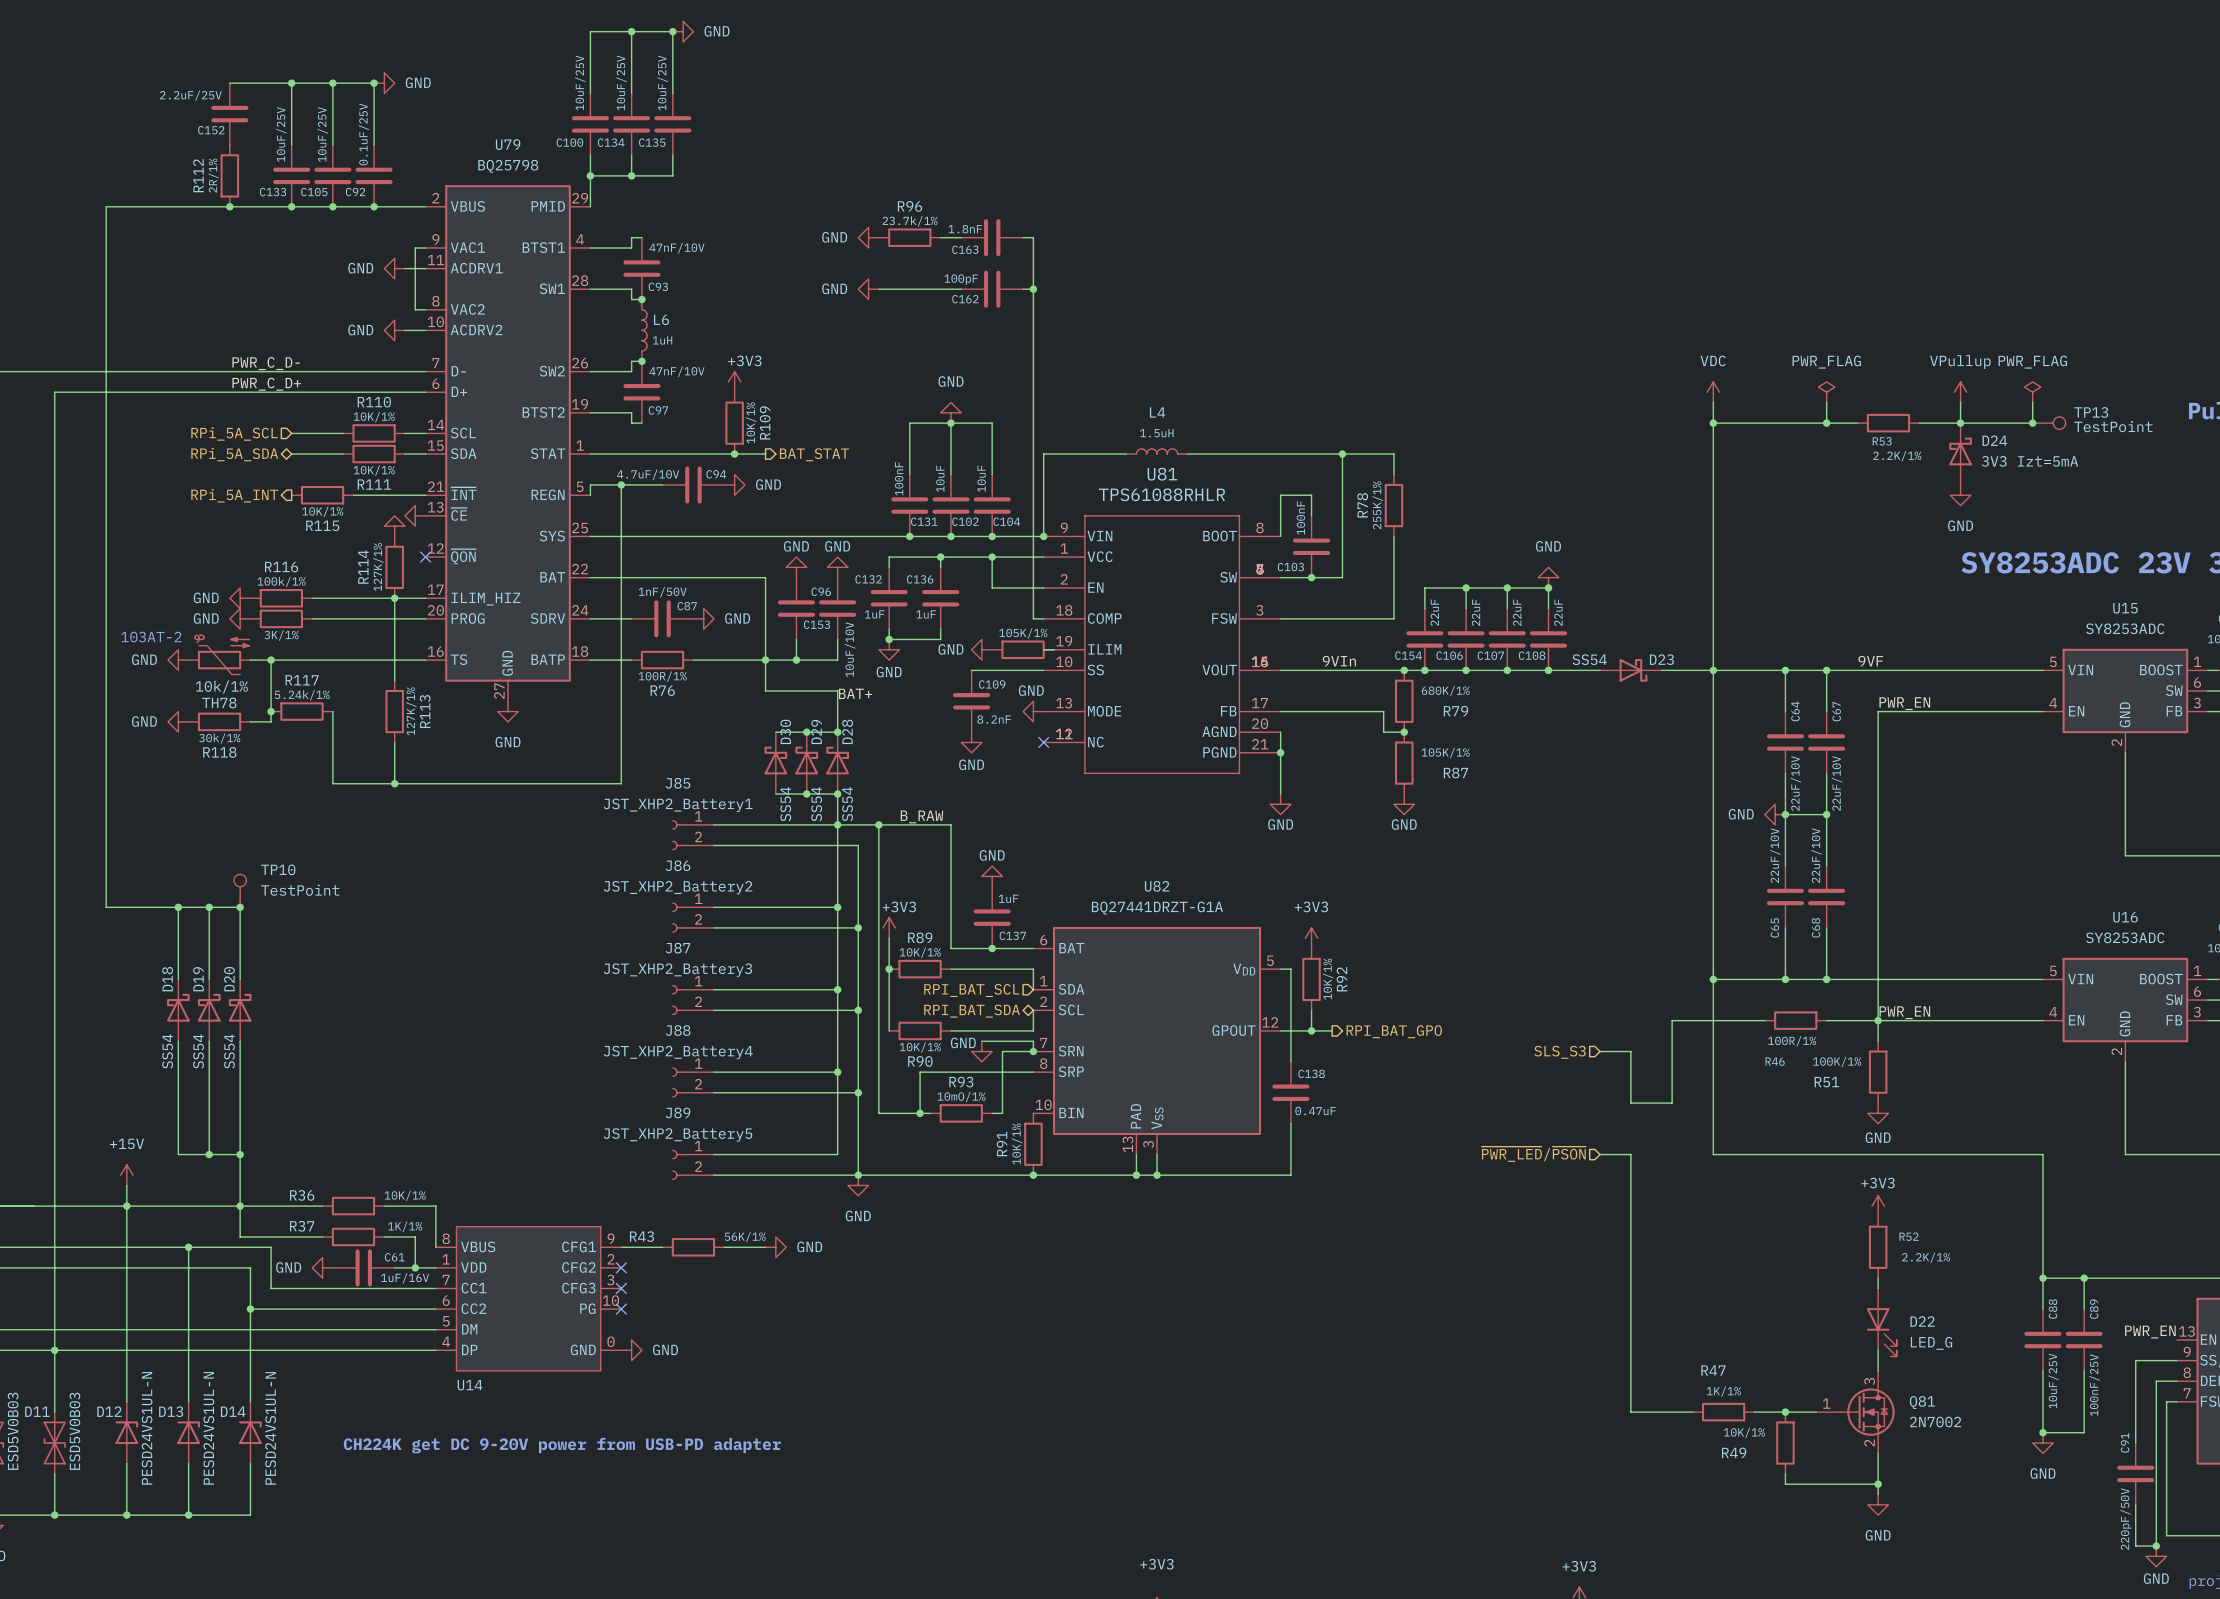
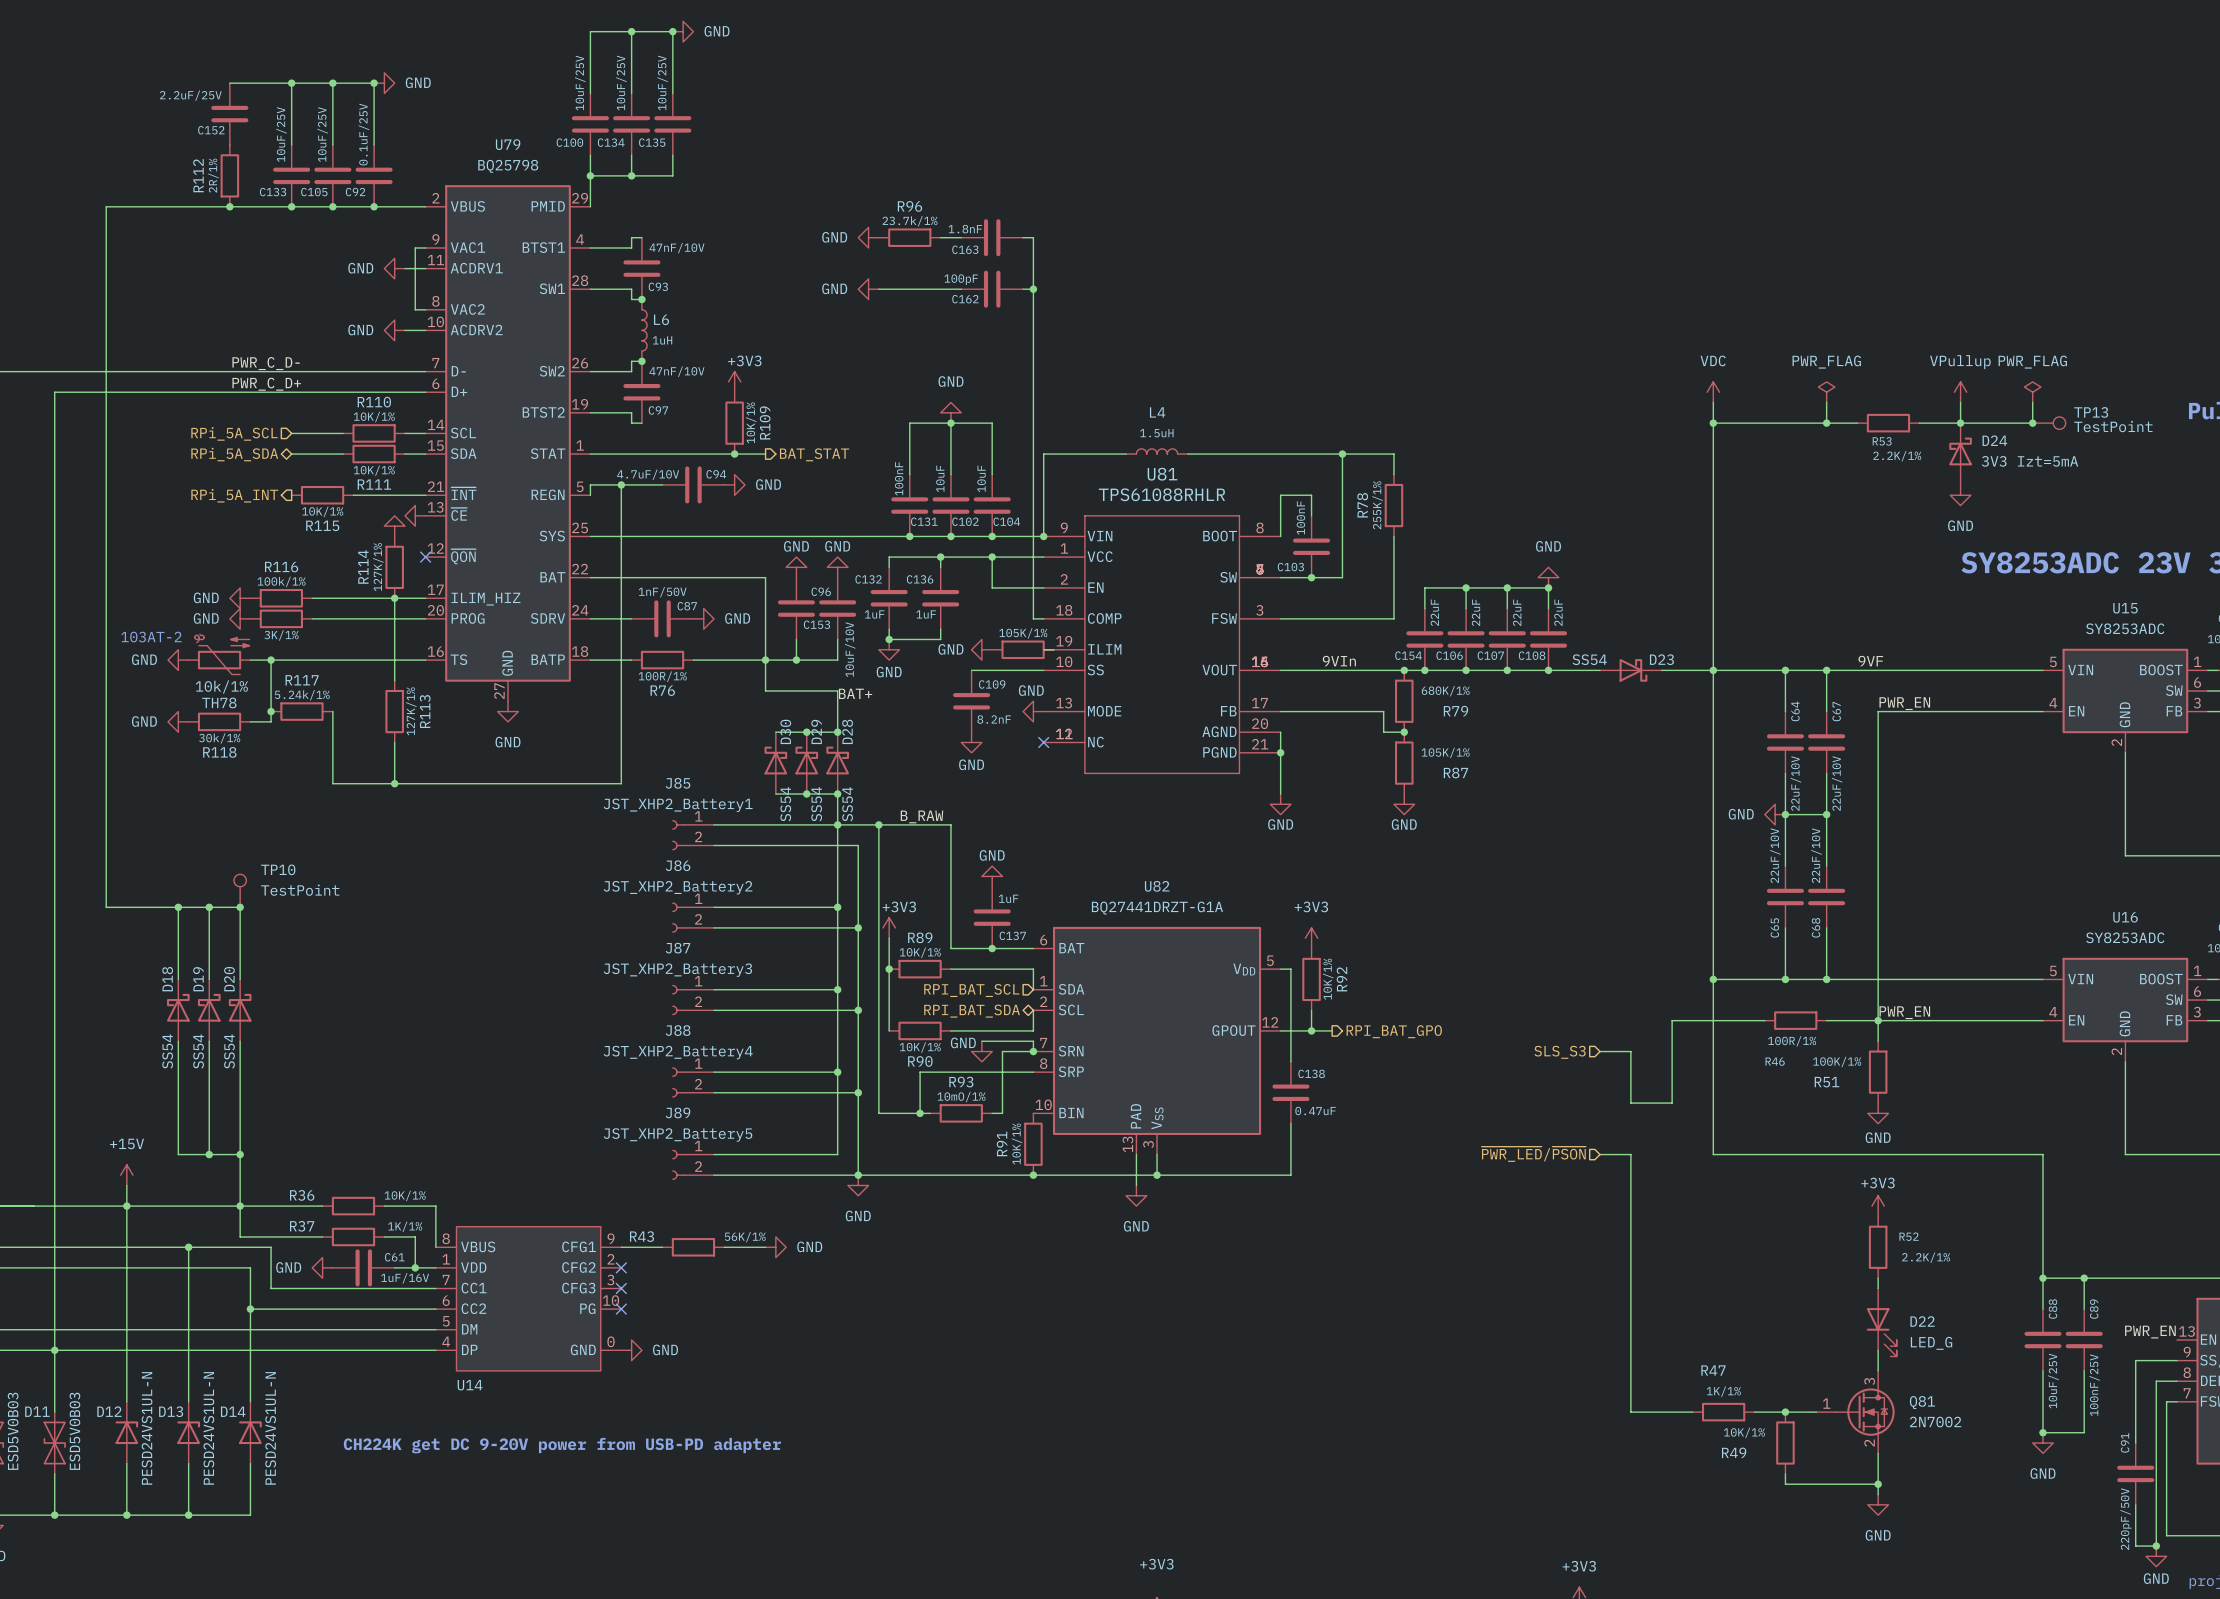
wire: none -> (1136, 1175) (1136, 1185)
junction: (1136, 1175) -> none
power symbol: none -> GND (1136, 1195)

